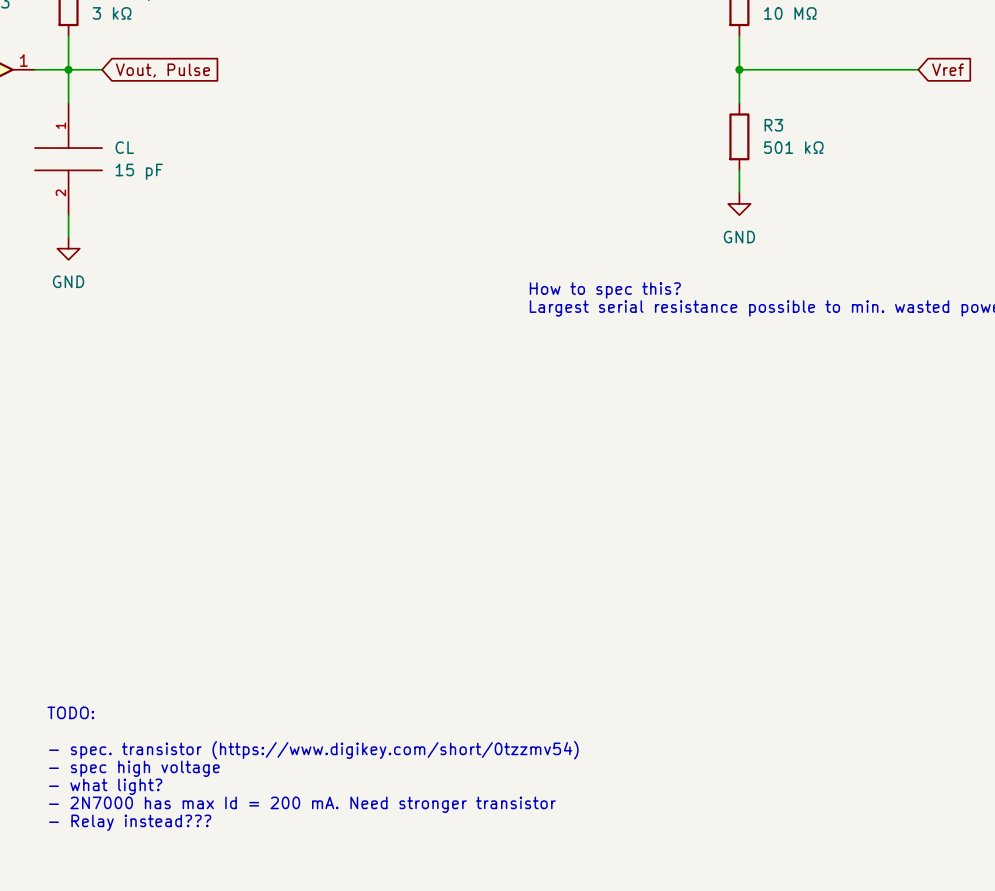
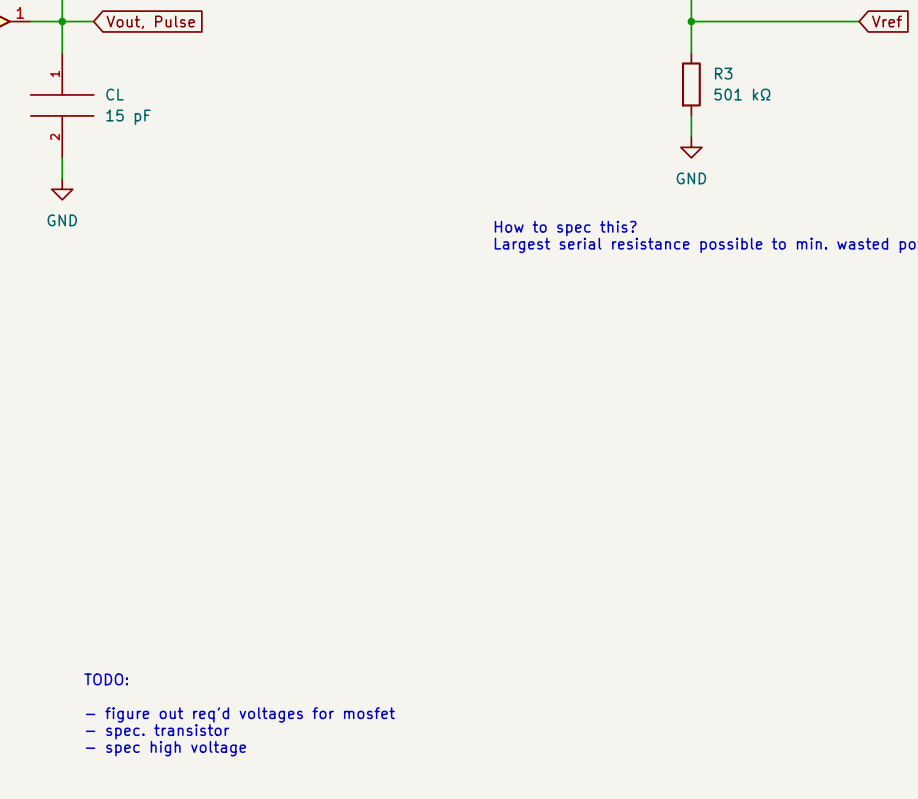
text position: TODO: (70, 712) -> TODO: (106, 679)
text: - spec. transistor (https://www.digikey.com/short/0tzzmv54) (313, 750) -> none
text position: - spec high voltage (134, 768) -> - spec high voltage (165, 748)
text: - what light? (105, 786) -> none
text: - 2N7000 has max Id = 200 mA. Need stronger transistor (302, 804) -> none
text: none -> - figure out req'd voltages for mosfet (240, 714)
text: - Relay instead??? (130, 822) -> none
text: none -> - spec. transistor (157, 731)

